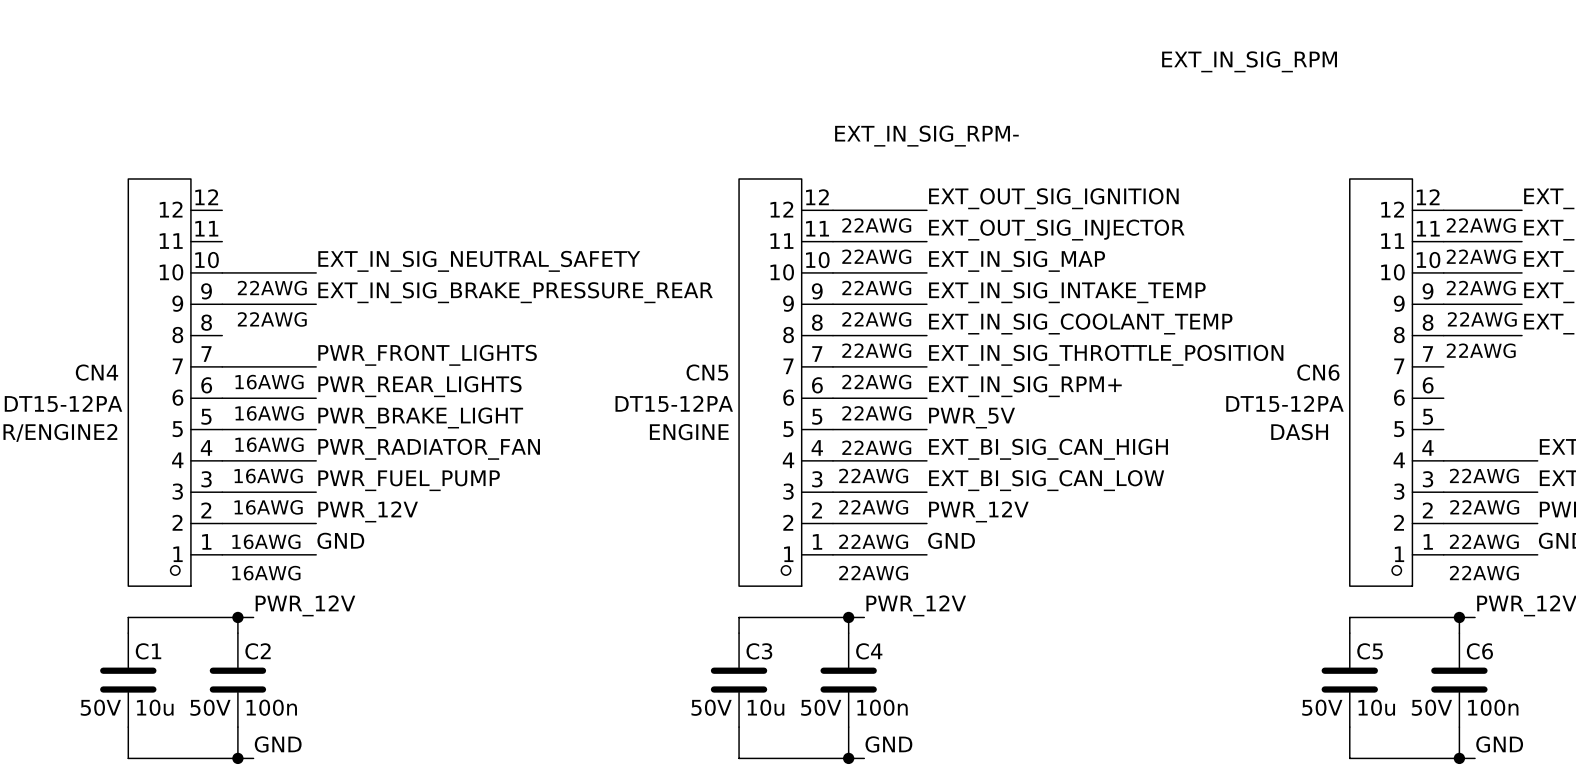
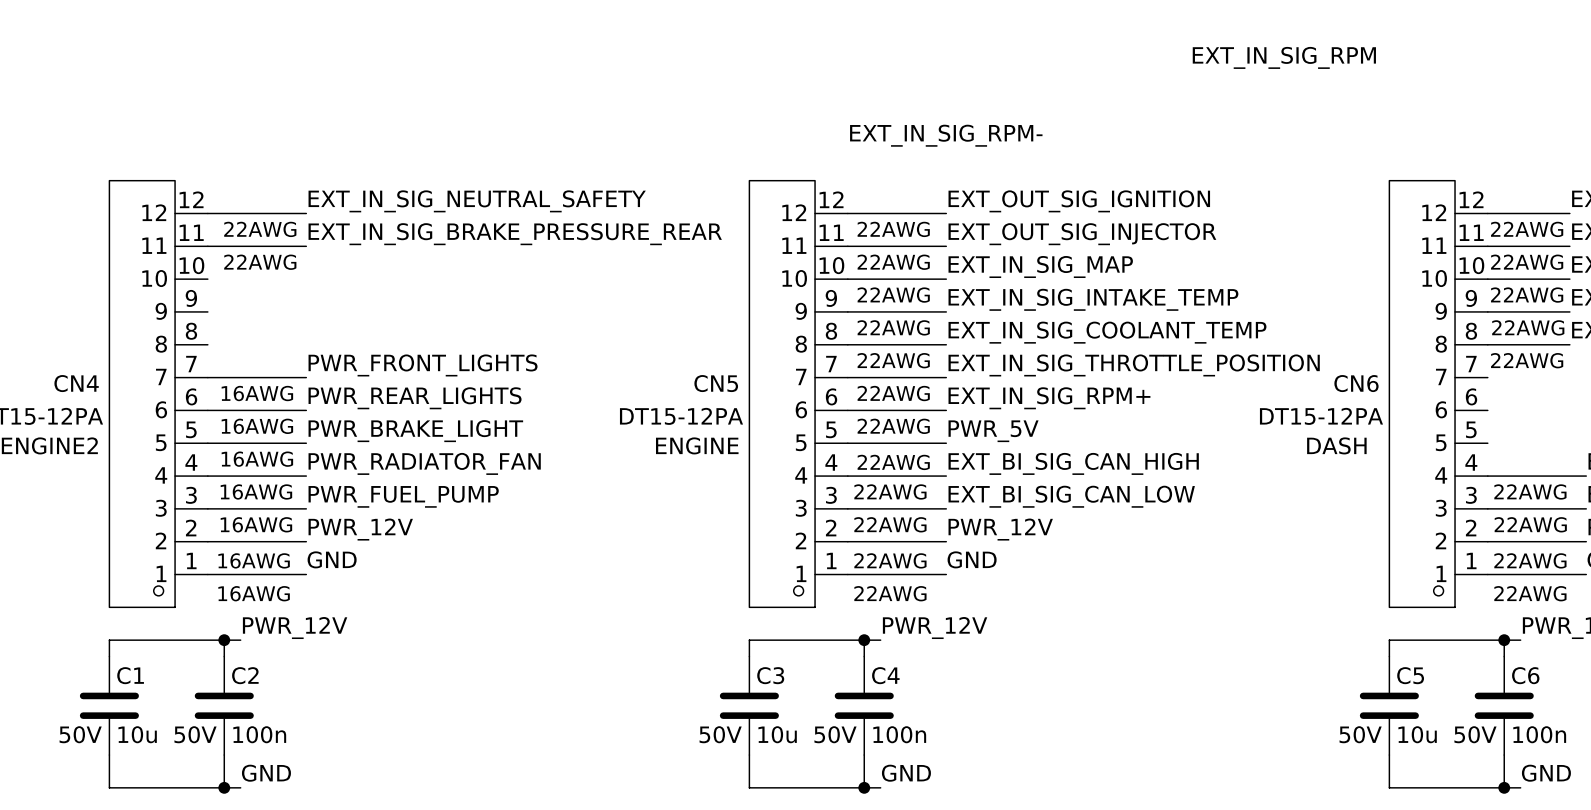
text: none -> 22AWG (260, 229)
text: none -> 22AWG (260, 262)
label position: EXT_IN_SIG_NEUTRAL_SAFETY (479, 261) -> EXT_IN_SIG_NEUTRAL_SAFETY (477, 201)
wire: (222, 272) (316, 272) -> (207, 246) (306, 246)
text: 22AWG (272, 288) -> none
label position: EXT_IN_SIG_BRAKE_PRESSURE_REAR (515, 292) -> EXT_IN_SIG_BRAKE_PRESSURE_REAR (515, 234)
wire: (222, 304) (316, 304) -> (207, 213) (306, 213)
text: 22AWG (272, 319) -> none

